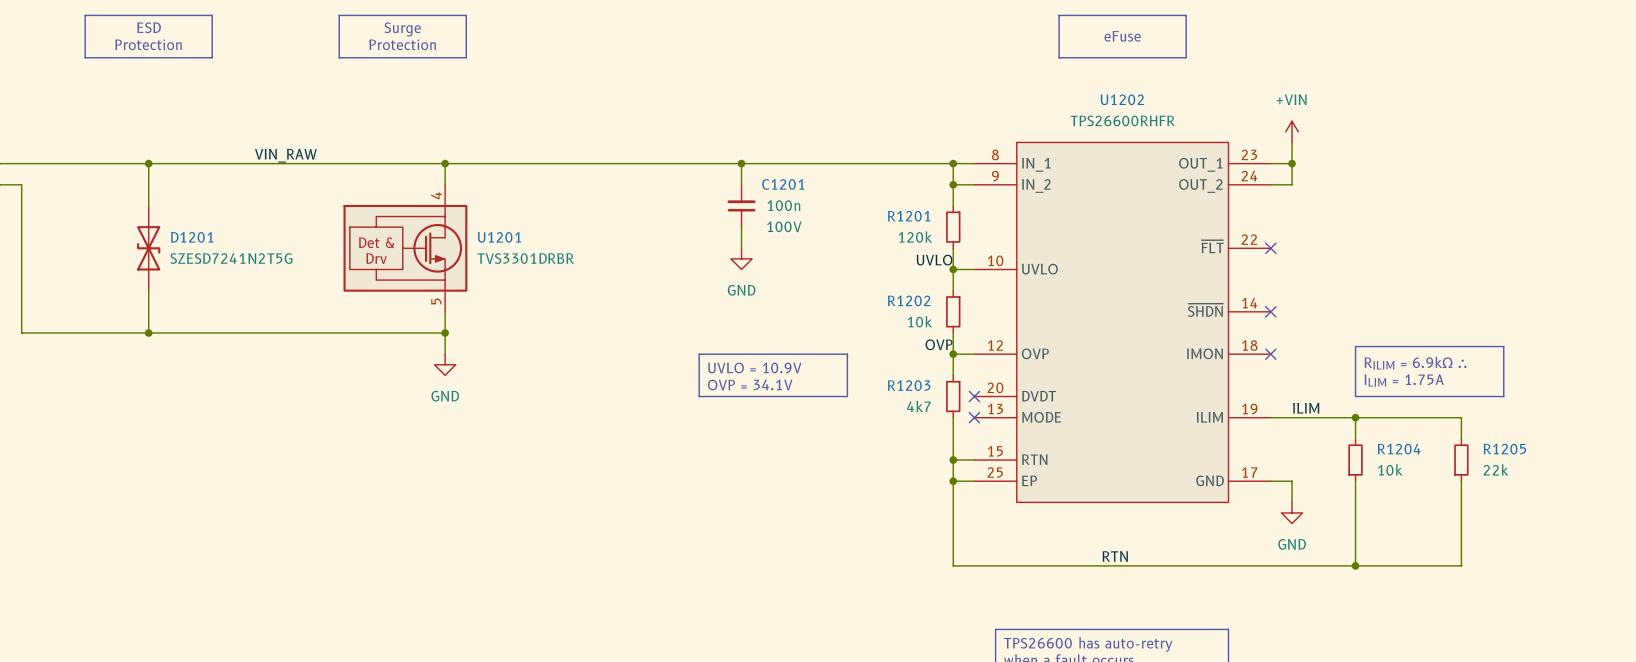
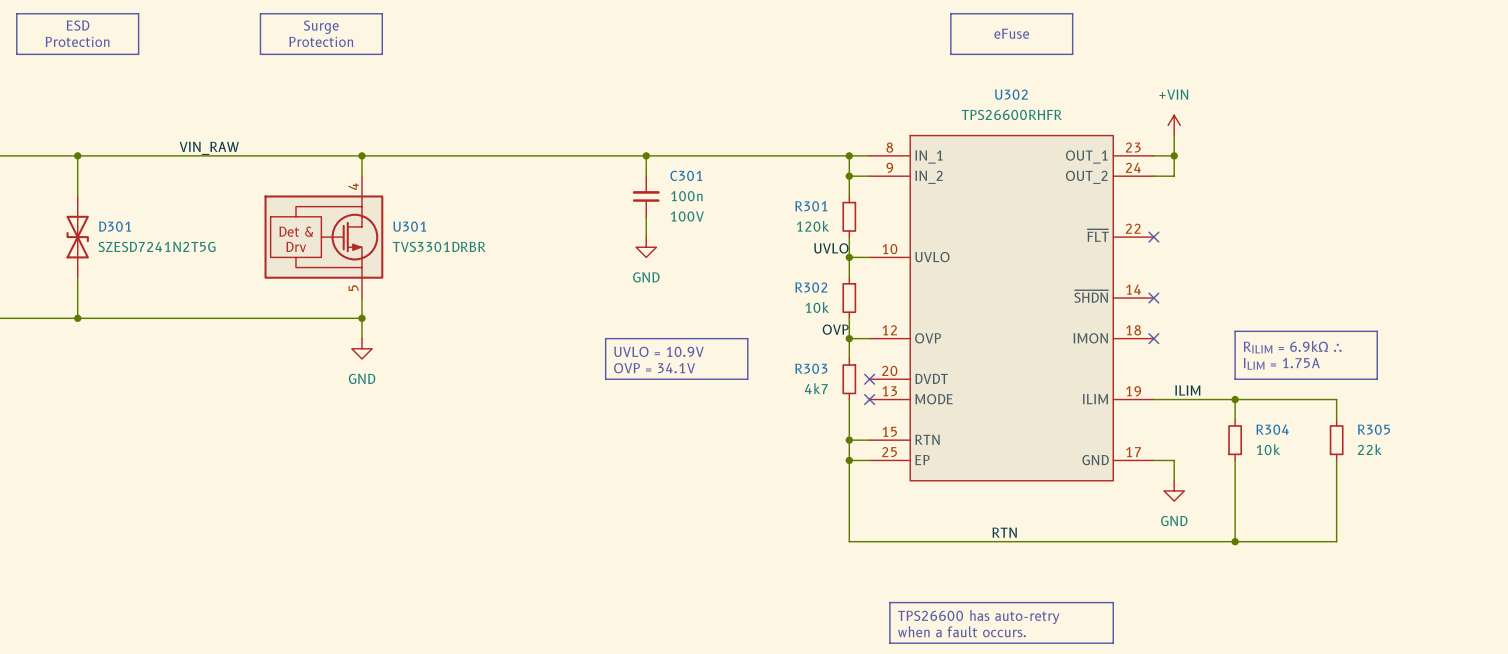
U1202 name: U1202 (1122, 99) -> U302 (1011, 94)
C1201 name: C1201 (783, 184) -> C301 (686, 175)
R1201 name: R1201 (909, 216) -> R301 (811, 206)
D1201 name: D1201 (192, 237) -> D301 (115, 226)
U1201 name: U1201 (499, 237) -> U301 (409, 226)
R1202 name: R1202 (909, 300) -> R302 (811, 287)
R1203 name: R1203 (909, 385) -> R303 (811, 368)
R1204 name: R1204 (1399, 449) -> R304 (1272, 429)
R1205 name: R1205 (1504, 449) -> R305 (1373, 429)

